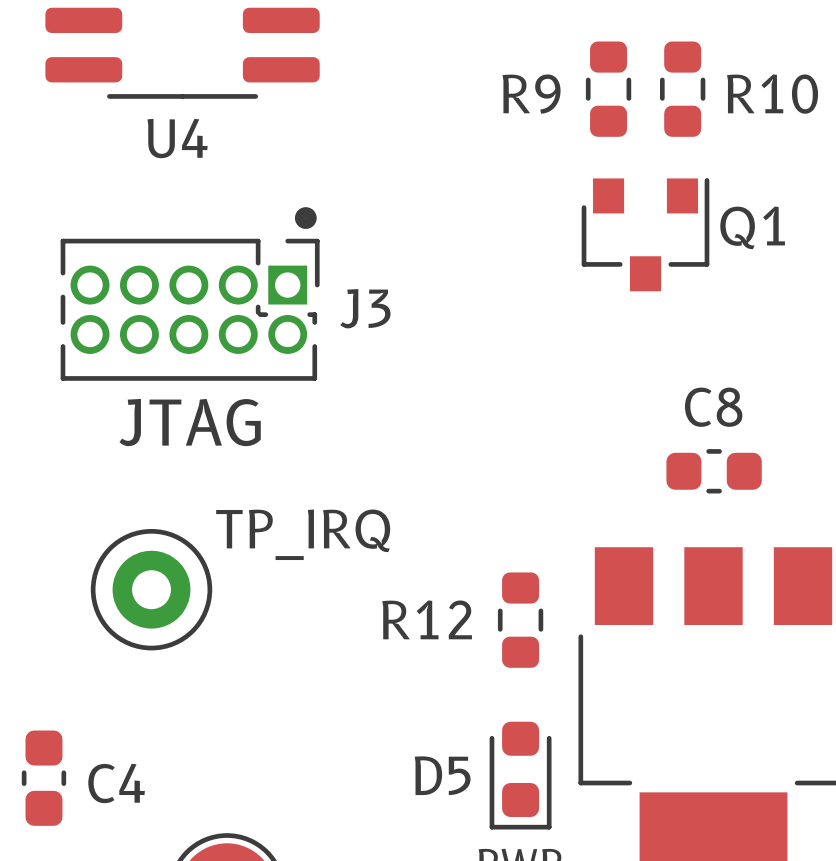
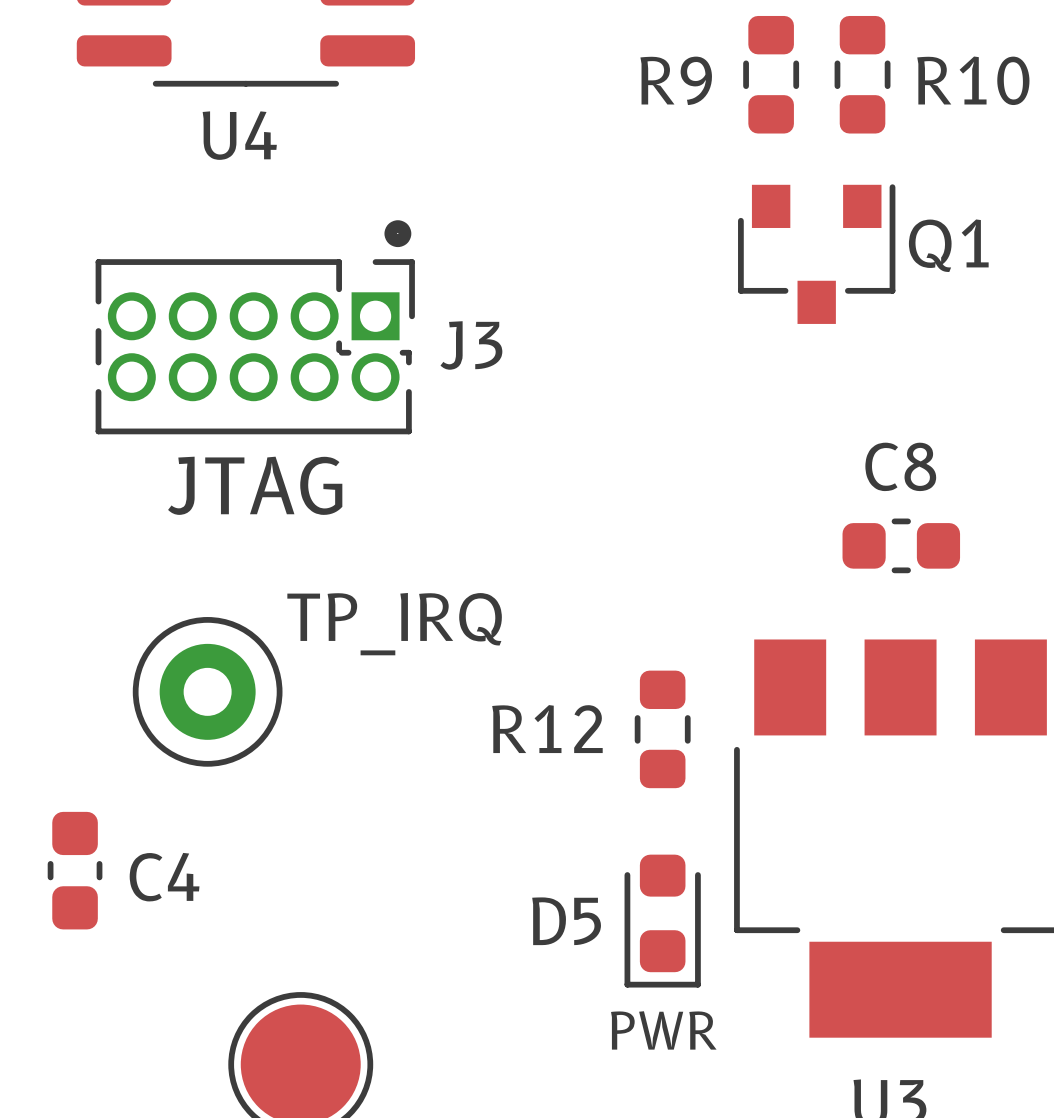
C4 position: (43, 778) -> (75, 870)

